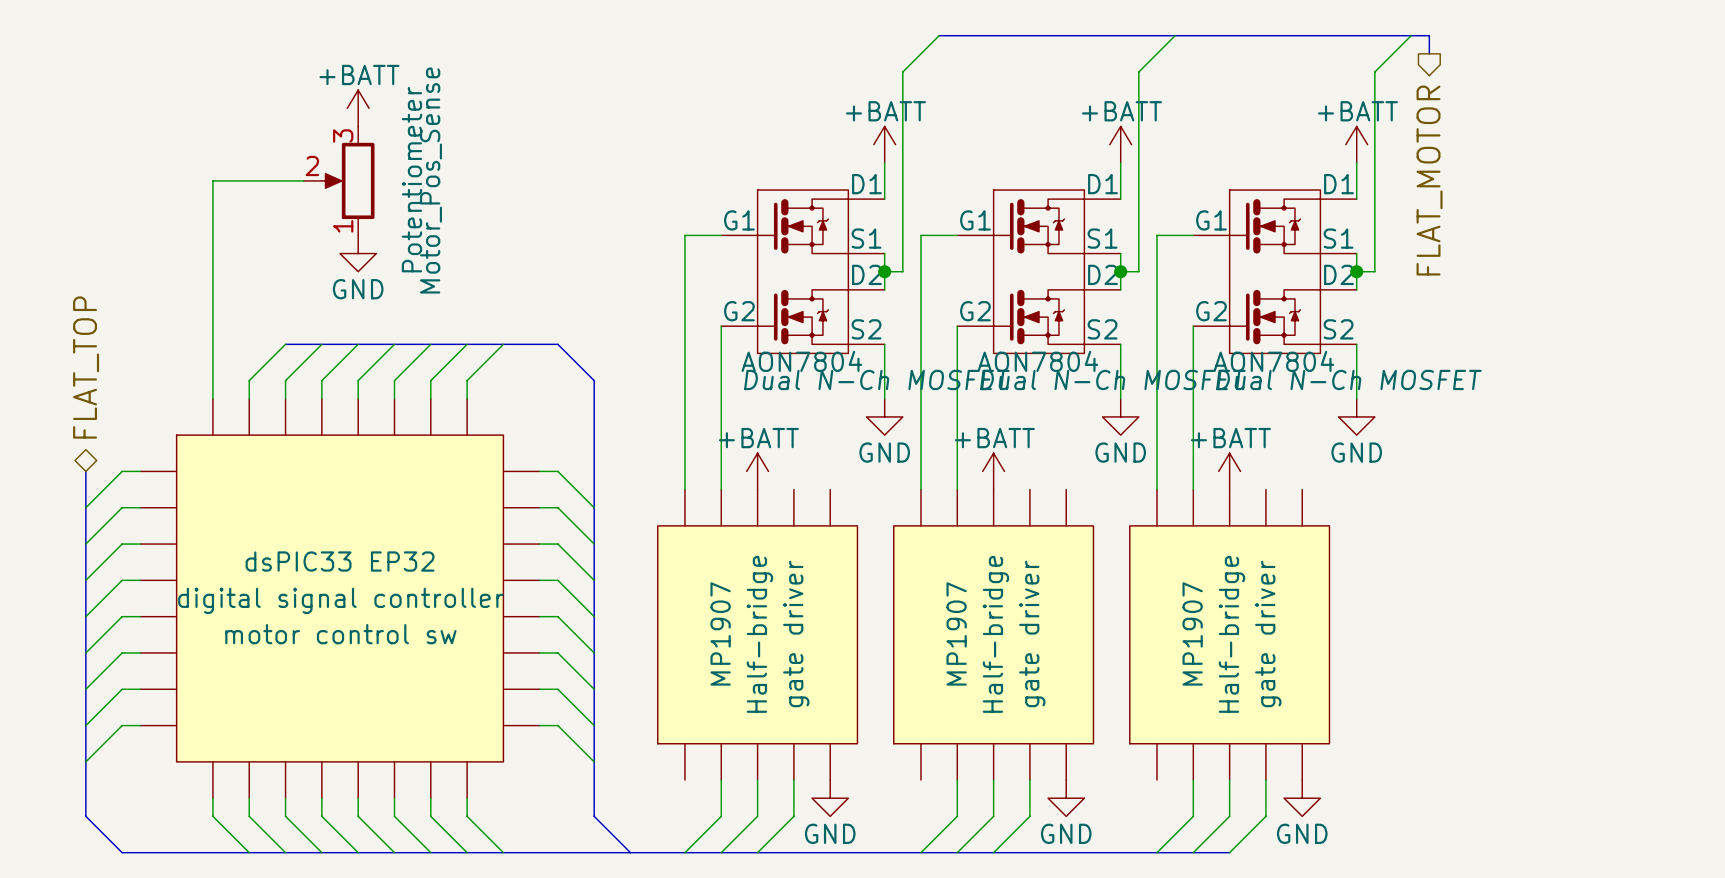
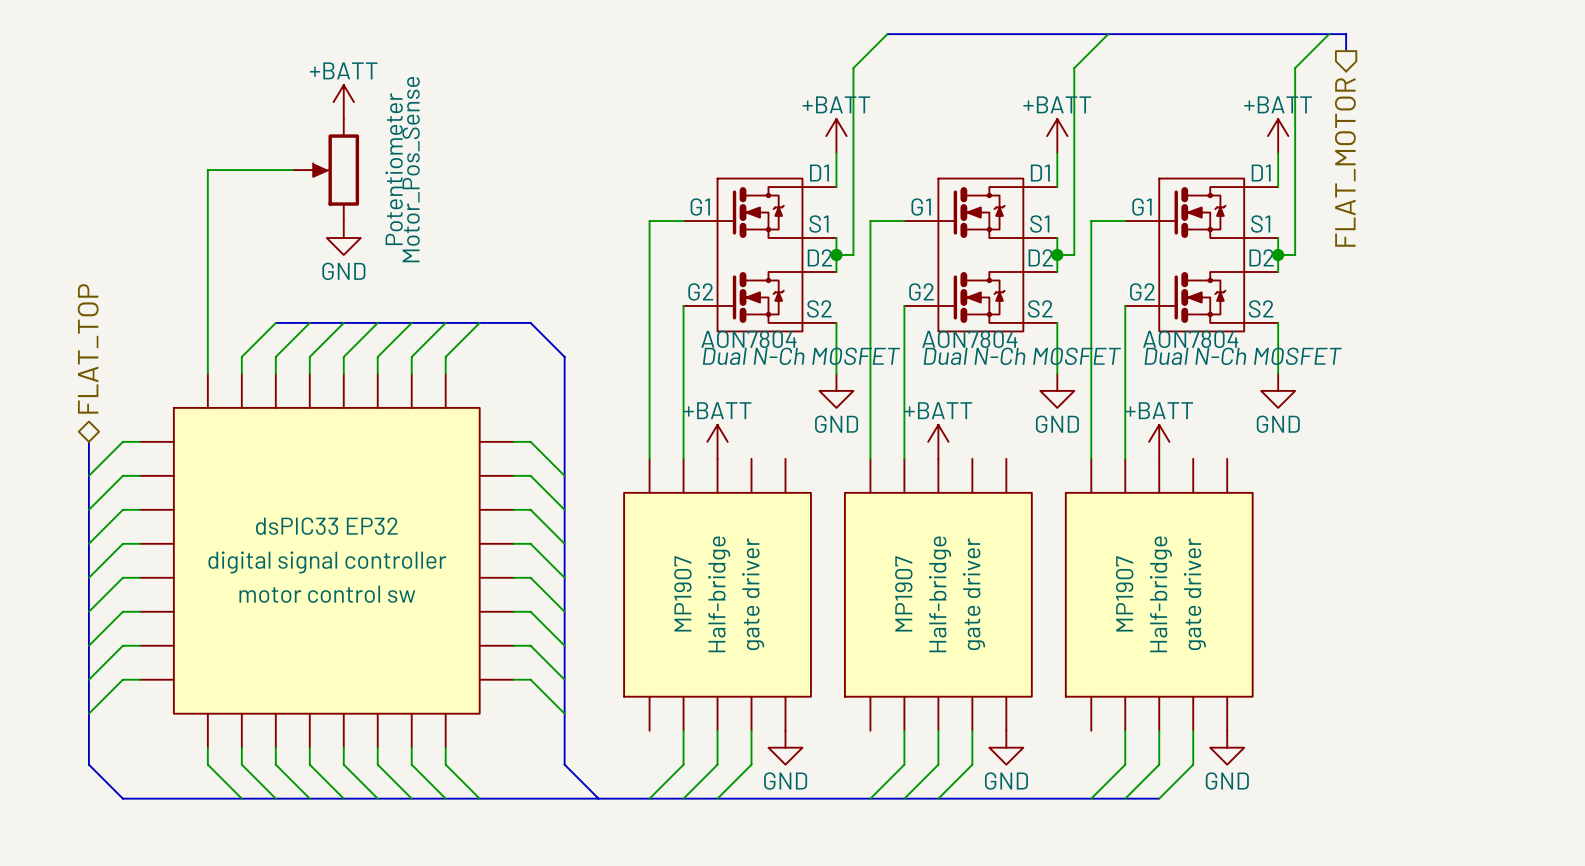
part symbol: [303, 126, 375, 236] -> [292, 119, 360, 222]

